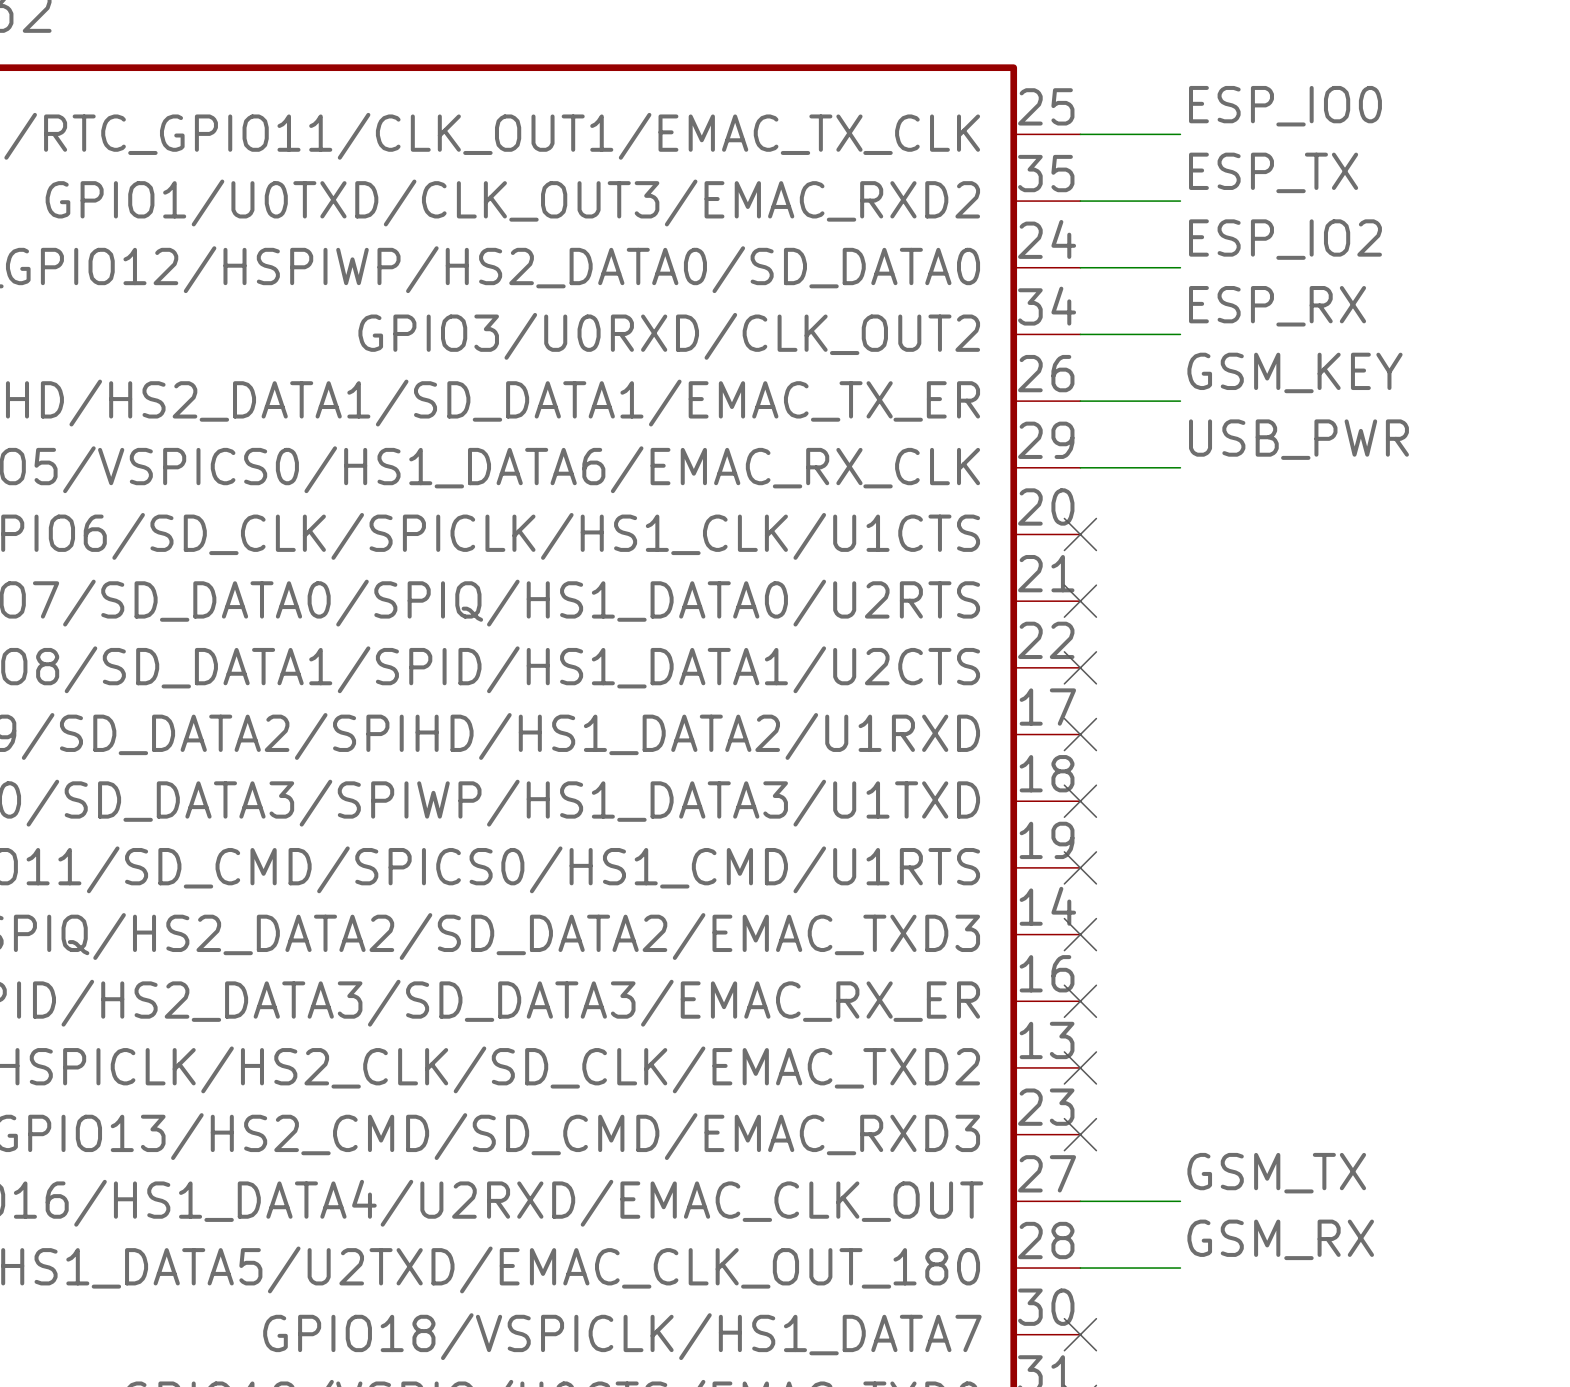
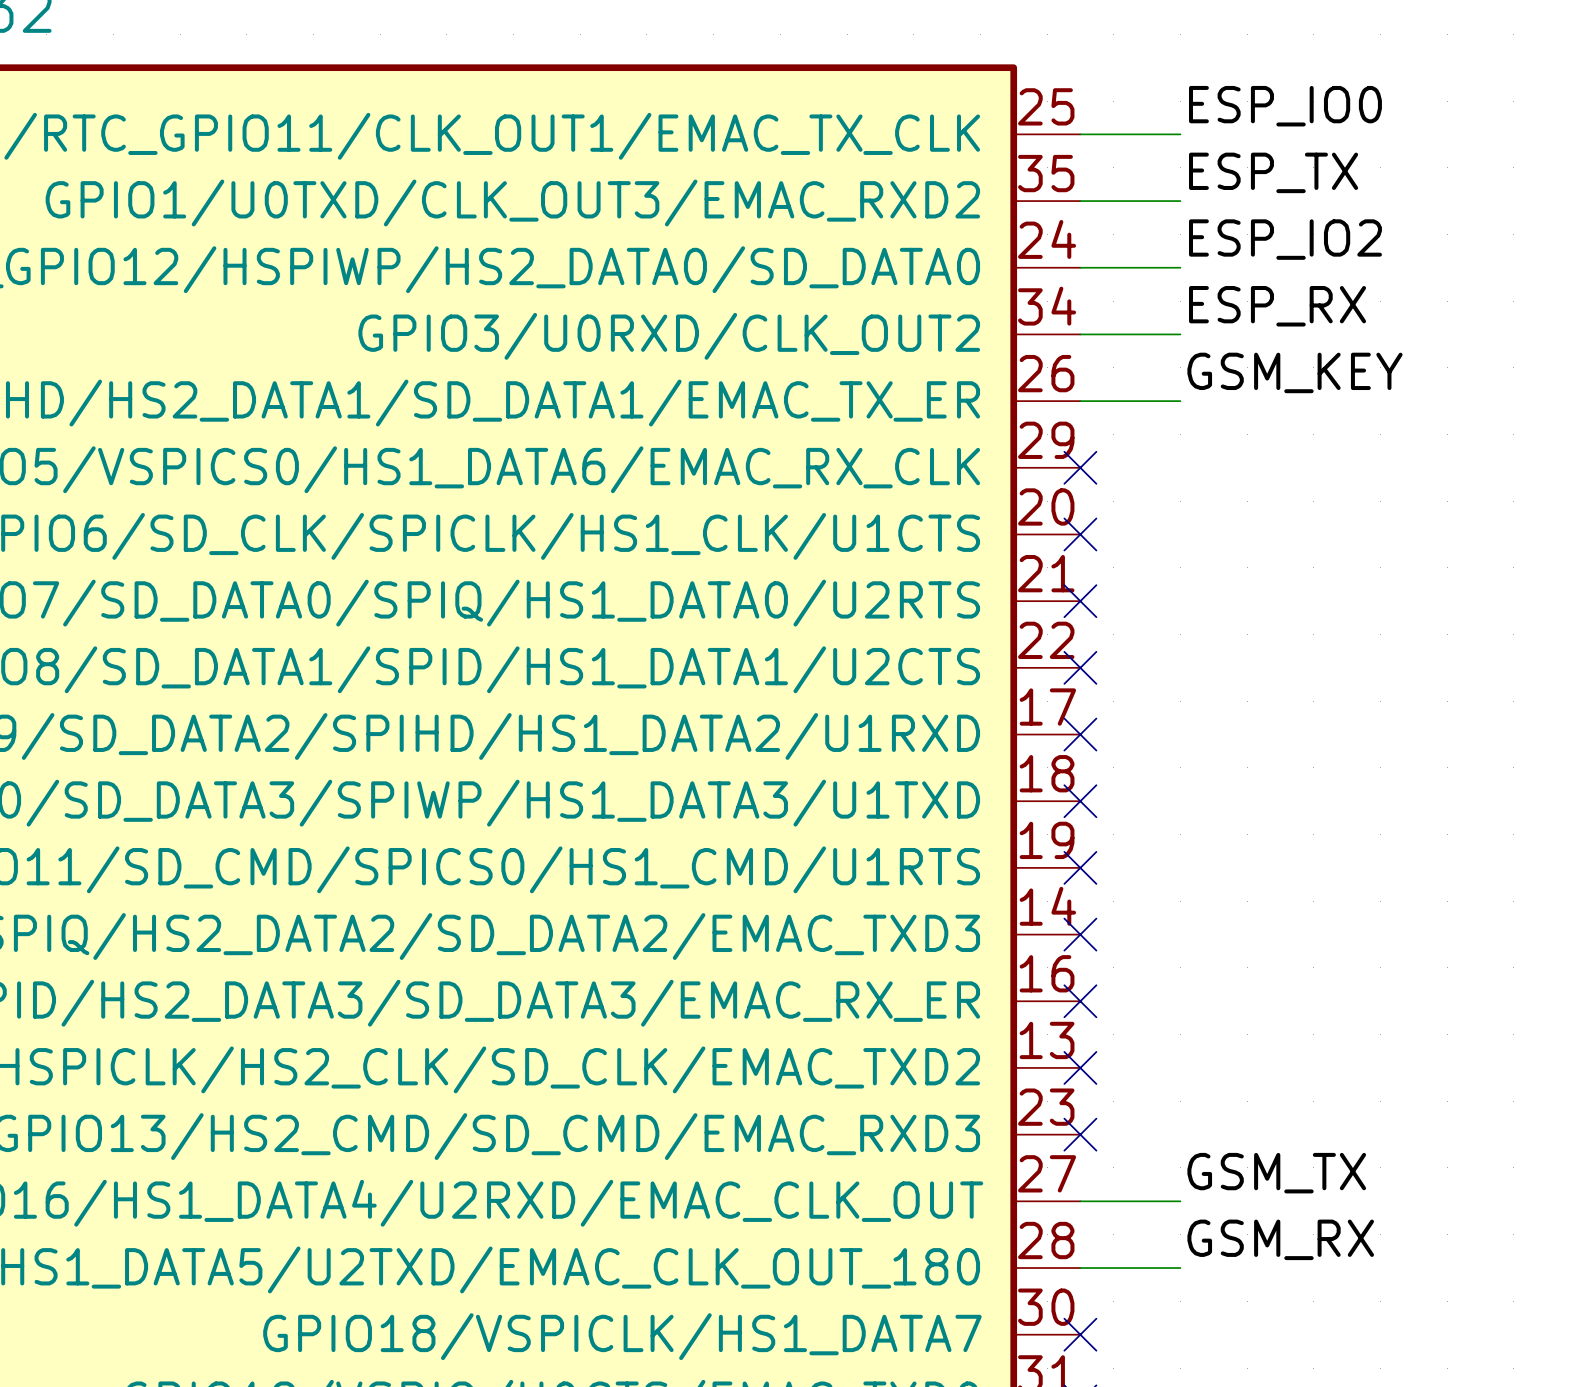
label: USB_PWR (1298, 439) -> none
wire: (1080, 467) (1180, 467) -> none
no-connect mark: none -> (1080, 467)

